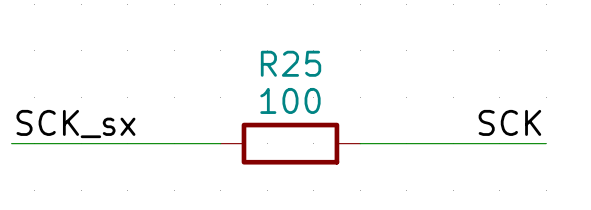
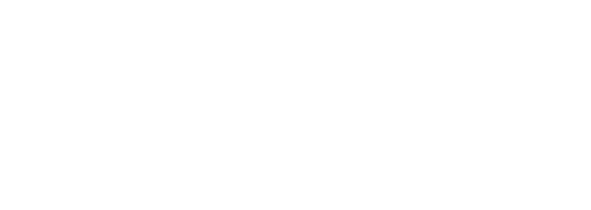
label: SCK (509, 122) -> none
label: SCK_sx (75, 124) -> none
wire: (11, 143) (220, 143) -> none
R25: 100 (290, 143) -> none
wire: (360, 143) (546, 143) -> none

